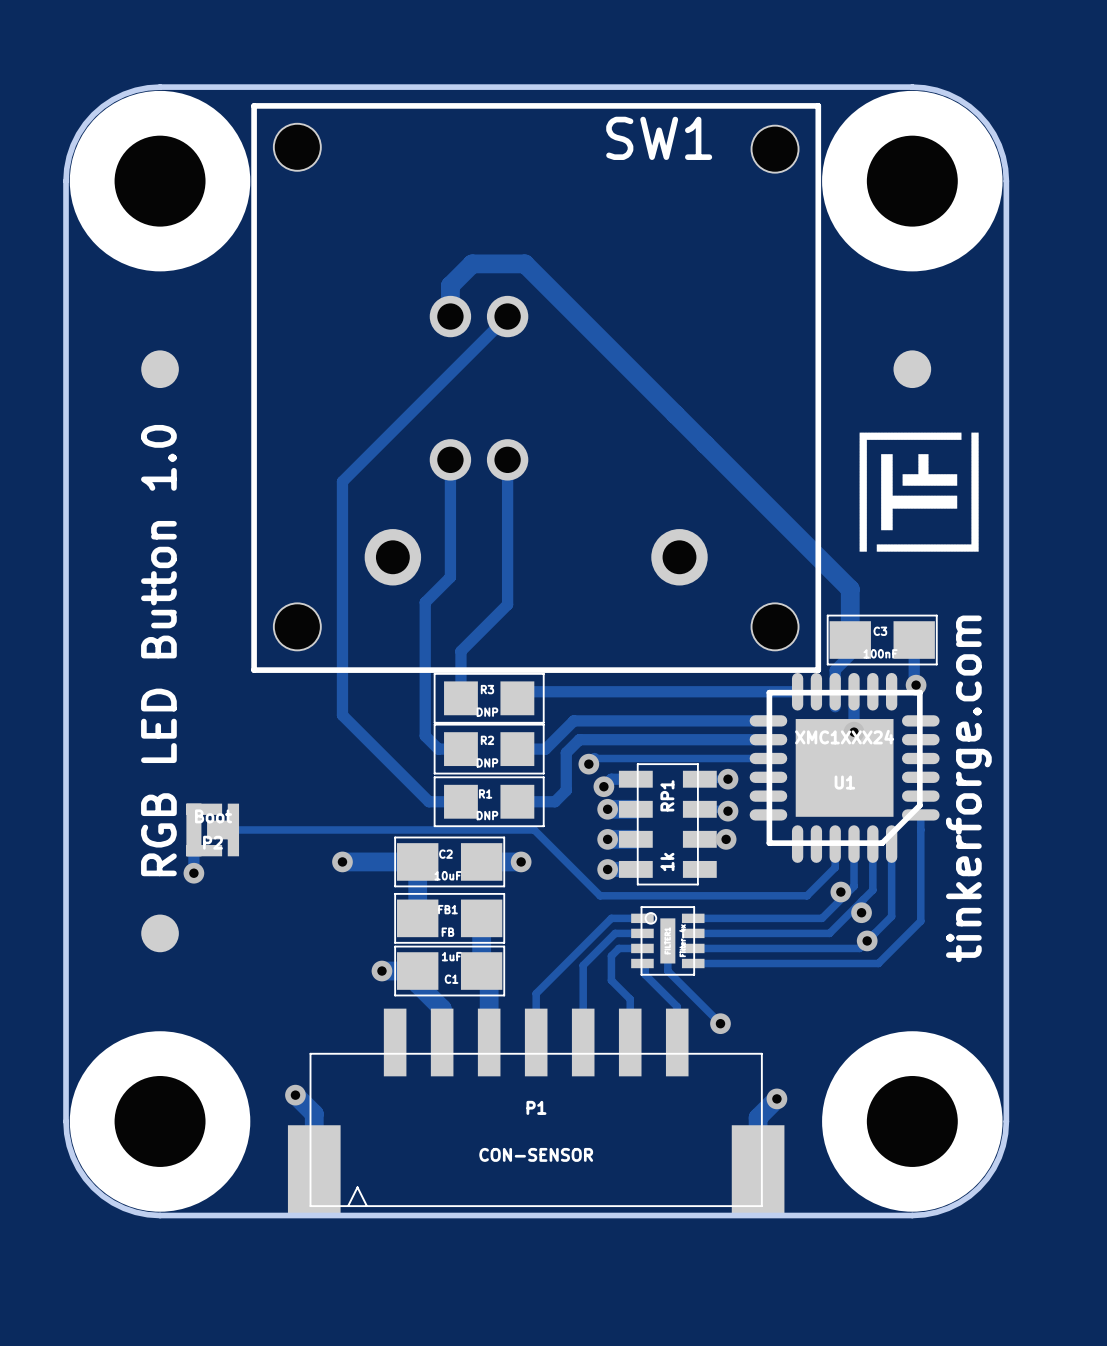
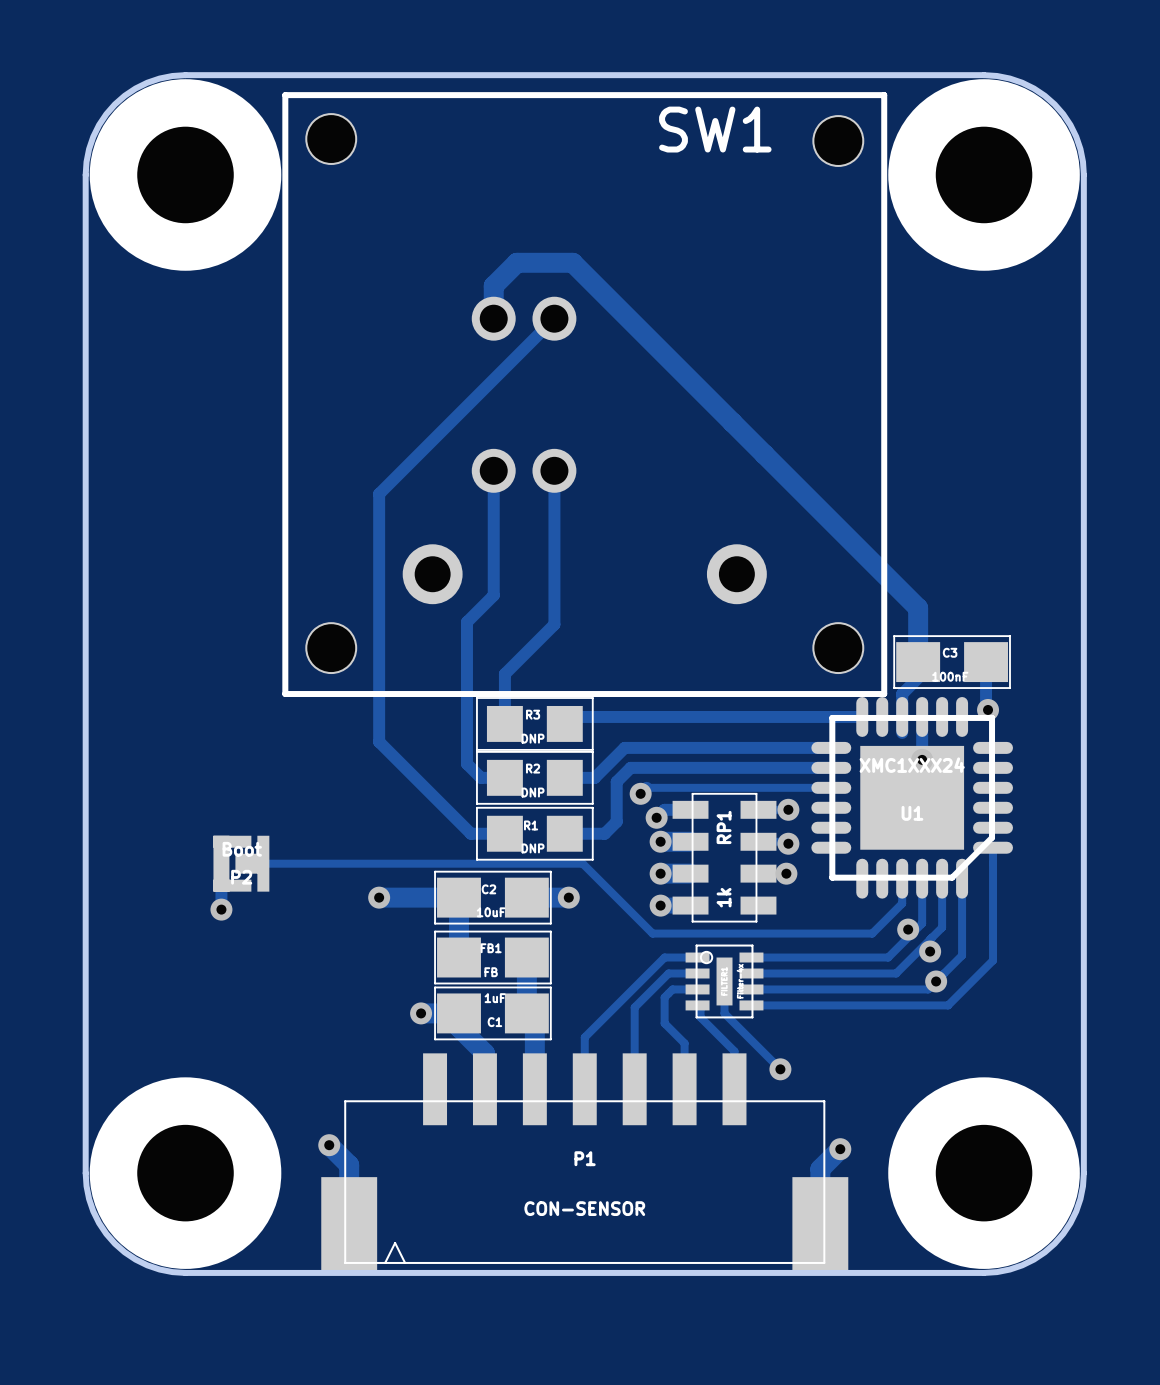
part: (160, 369) -> none
part: (912, 369) -> none
drawing: [859, 432, 979, 552] -> none
text: RGB LED Button 1.0 (158, 650) -> none
text: tinkerforge.com (968, 788) -> none
part: (160, 933) -> none

